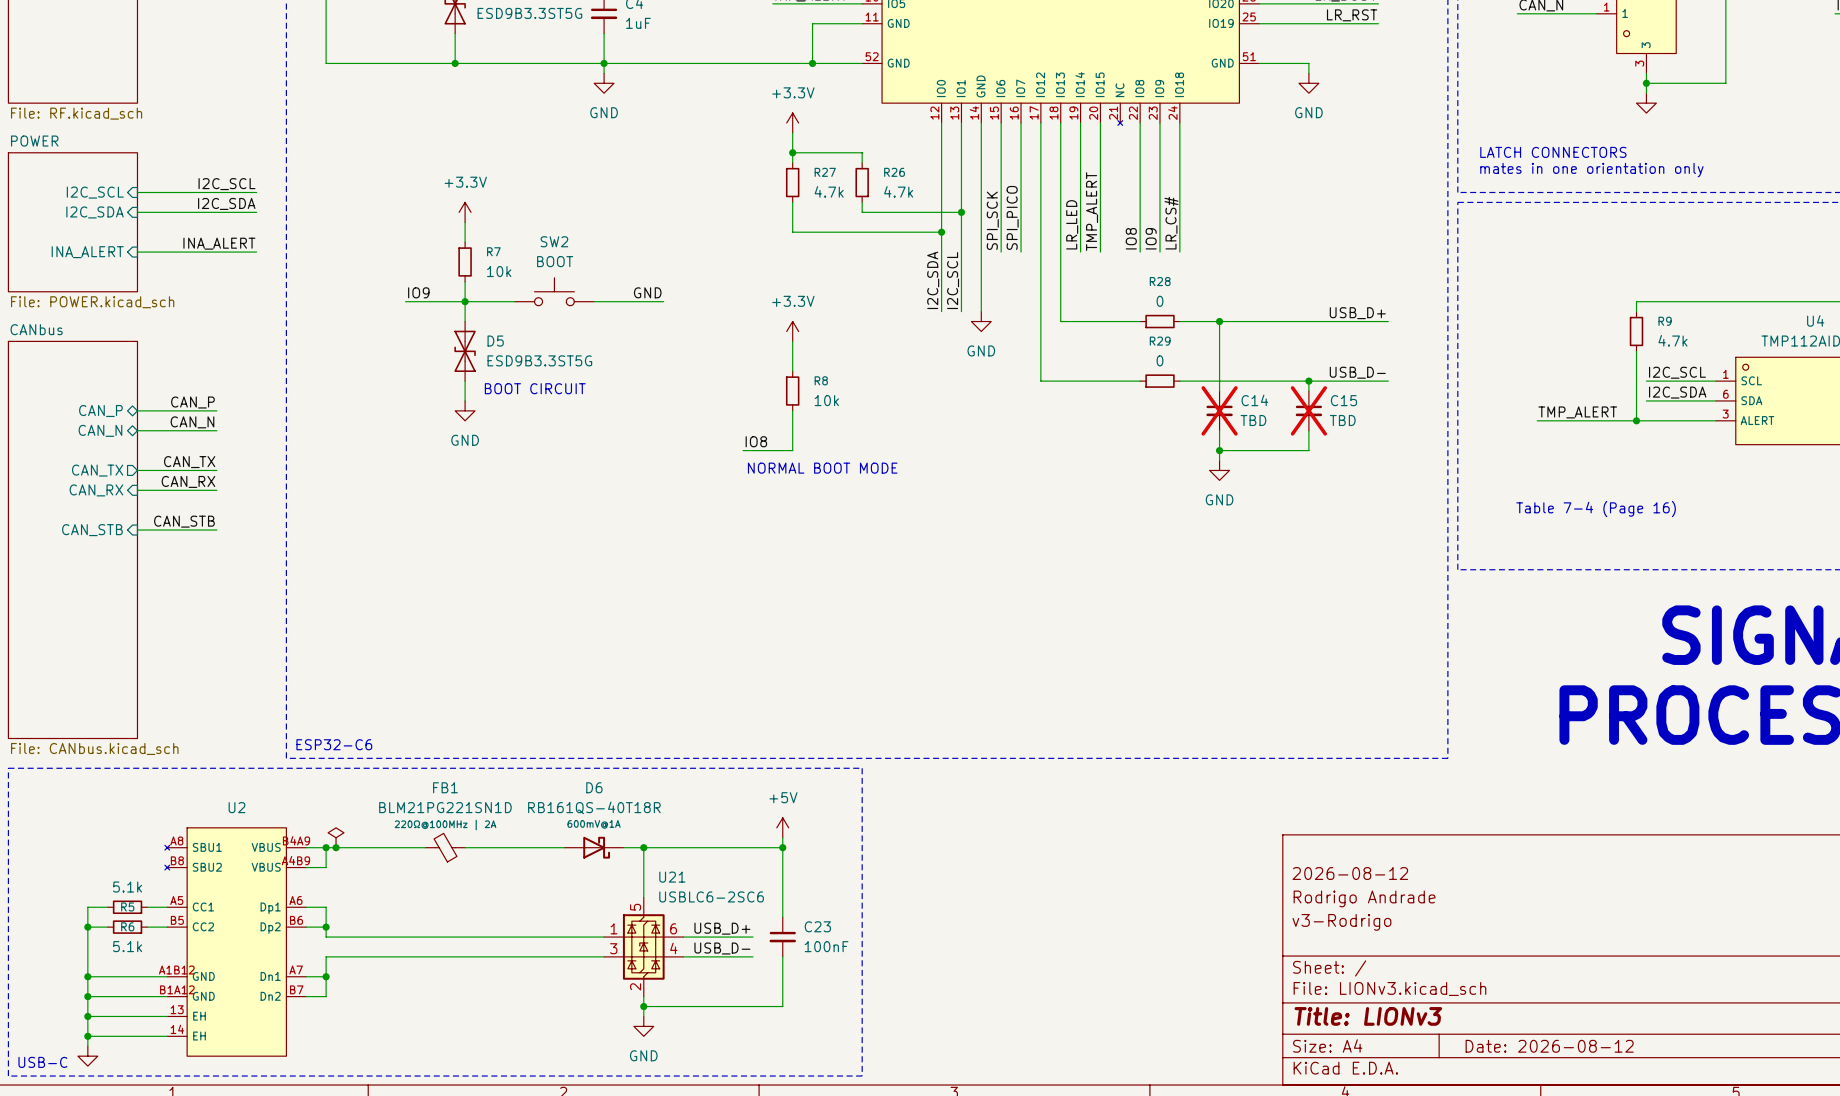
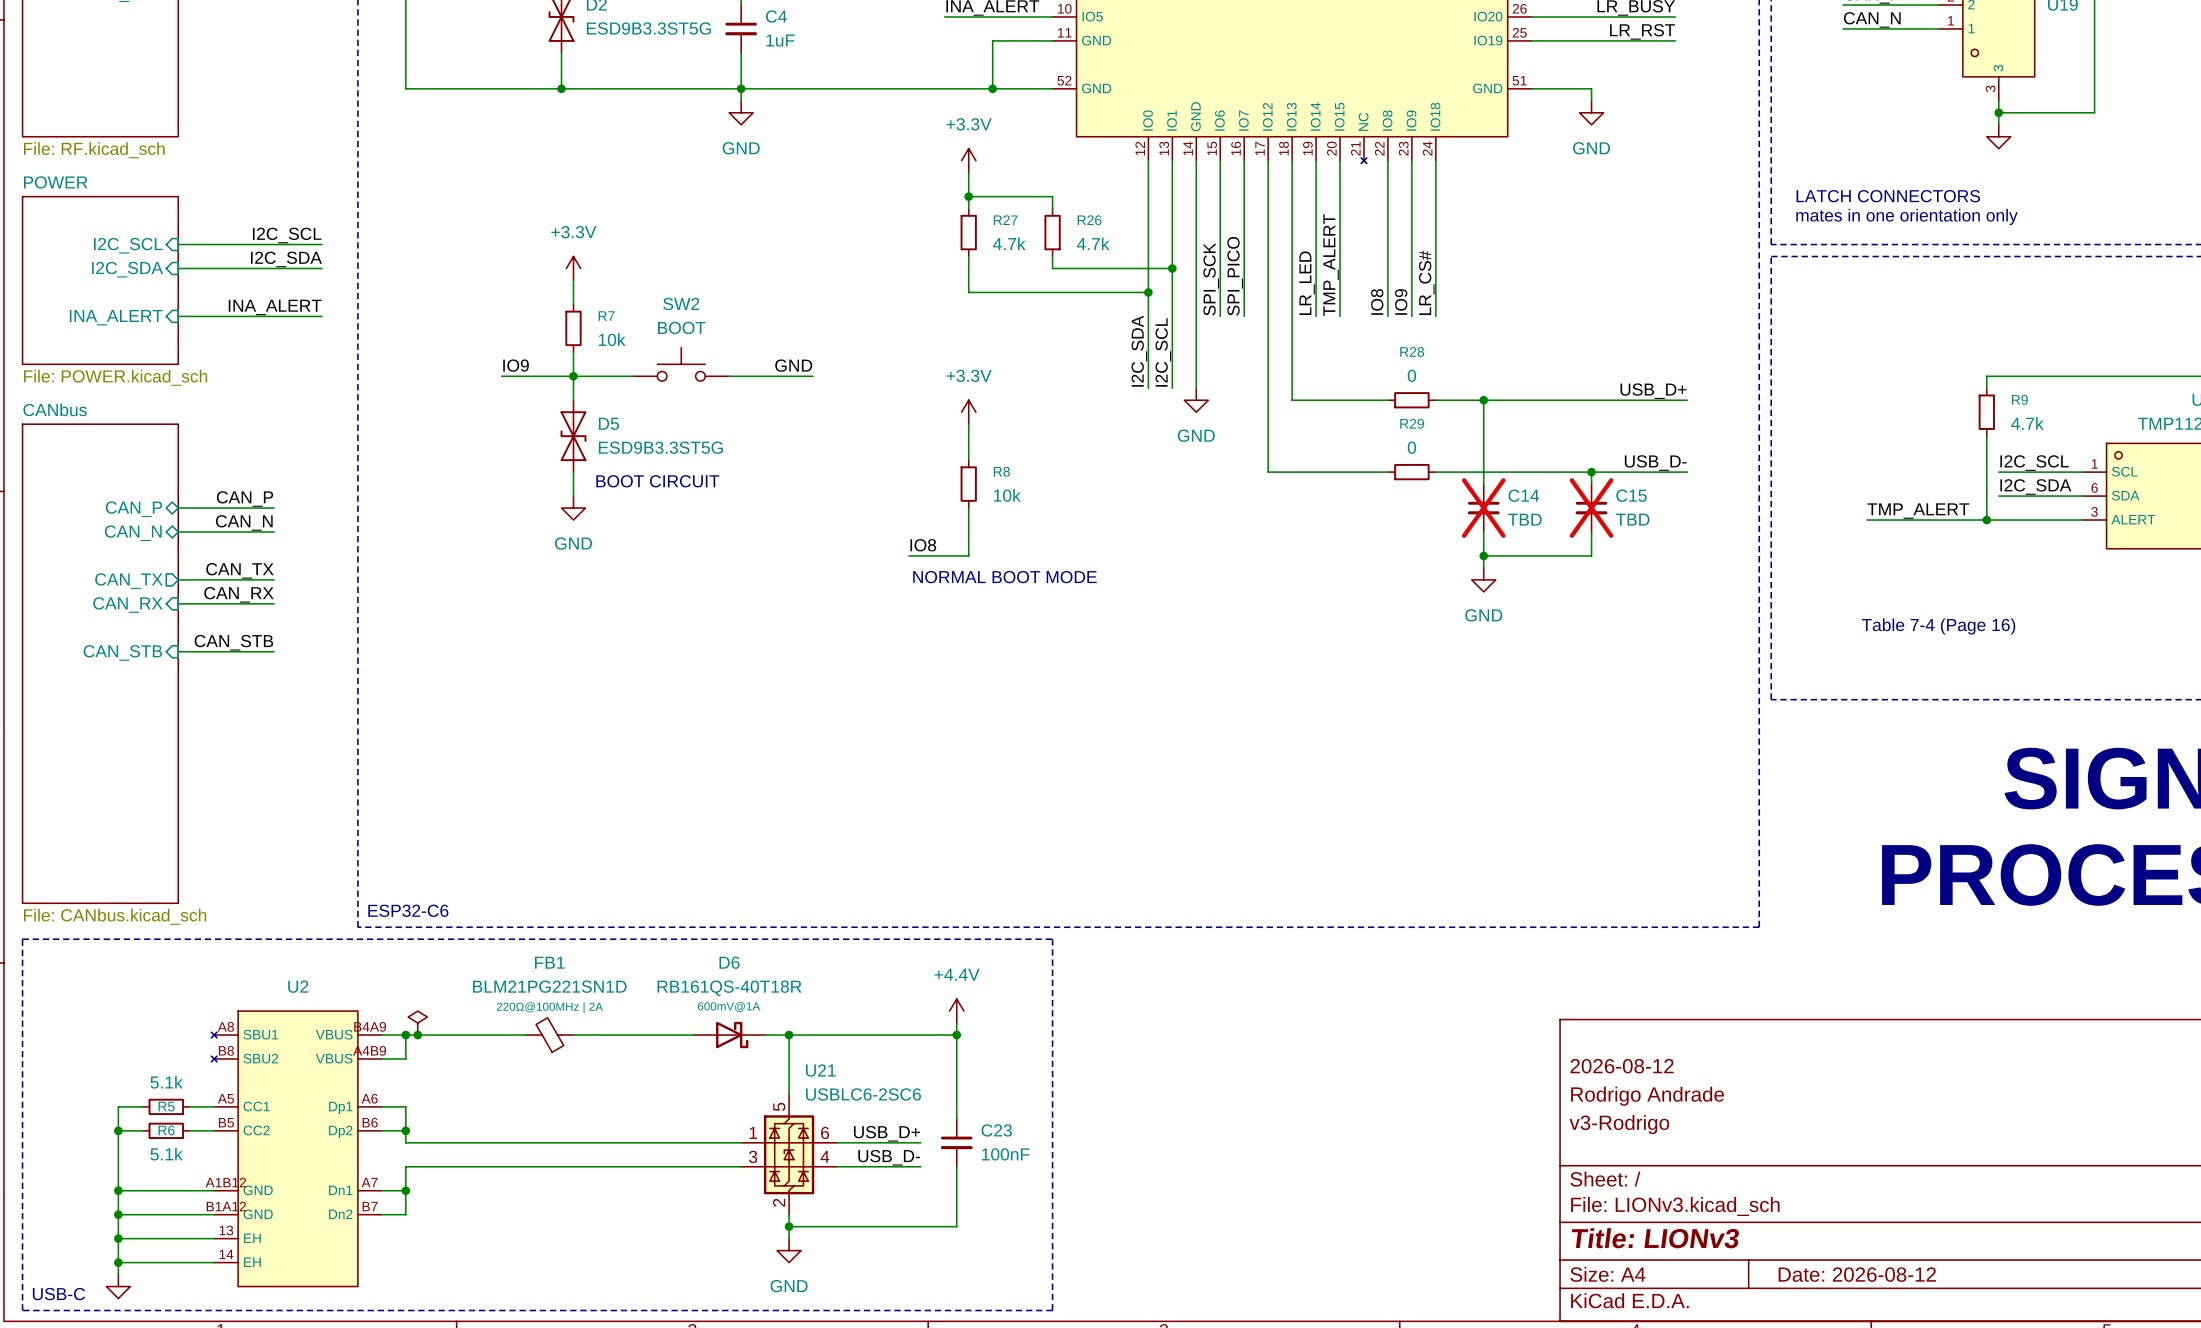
power symbol: +5V (782, 827) -> +4.4V (956, 1011)

